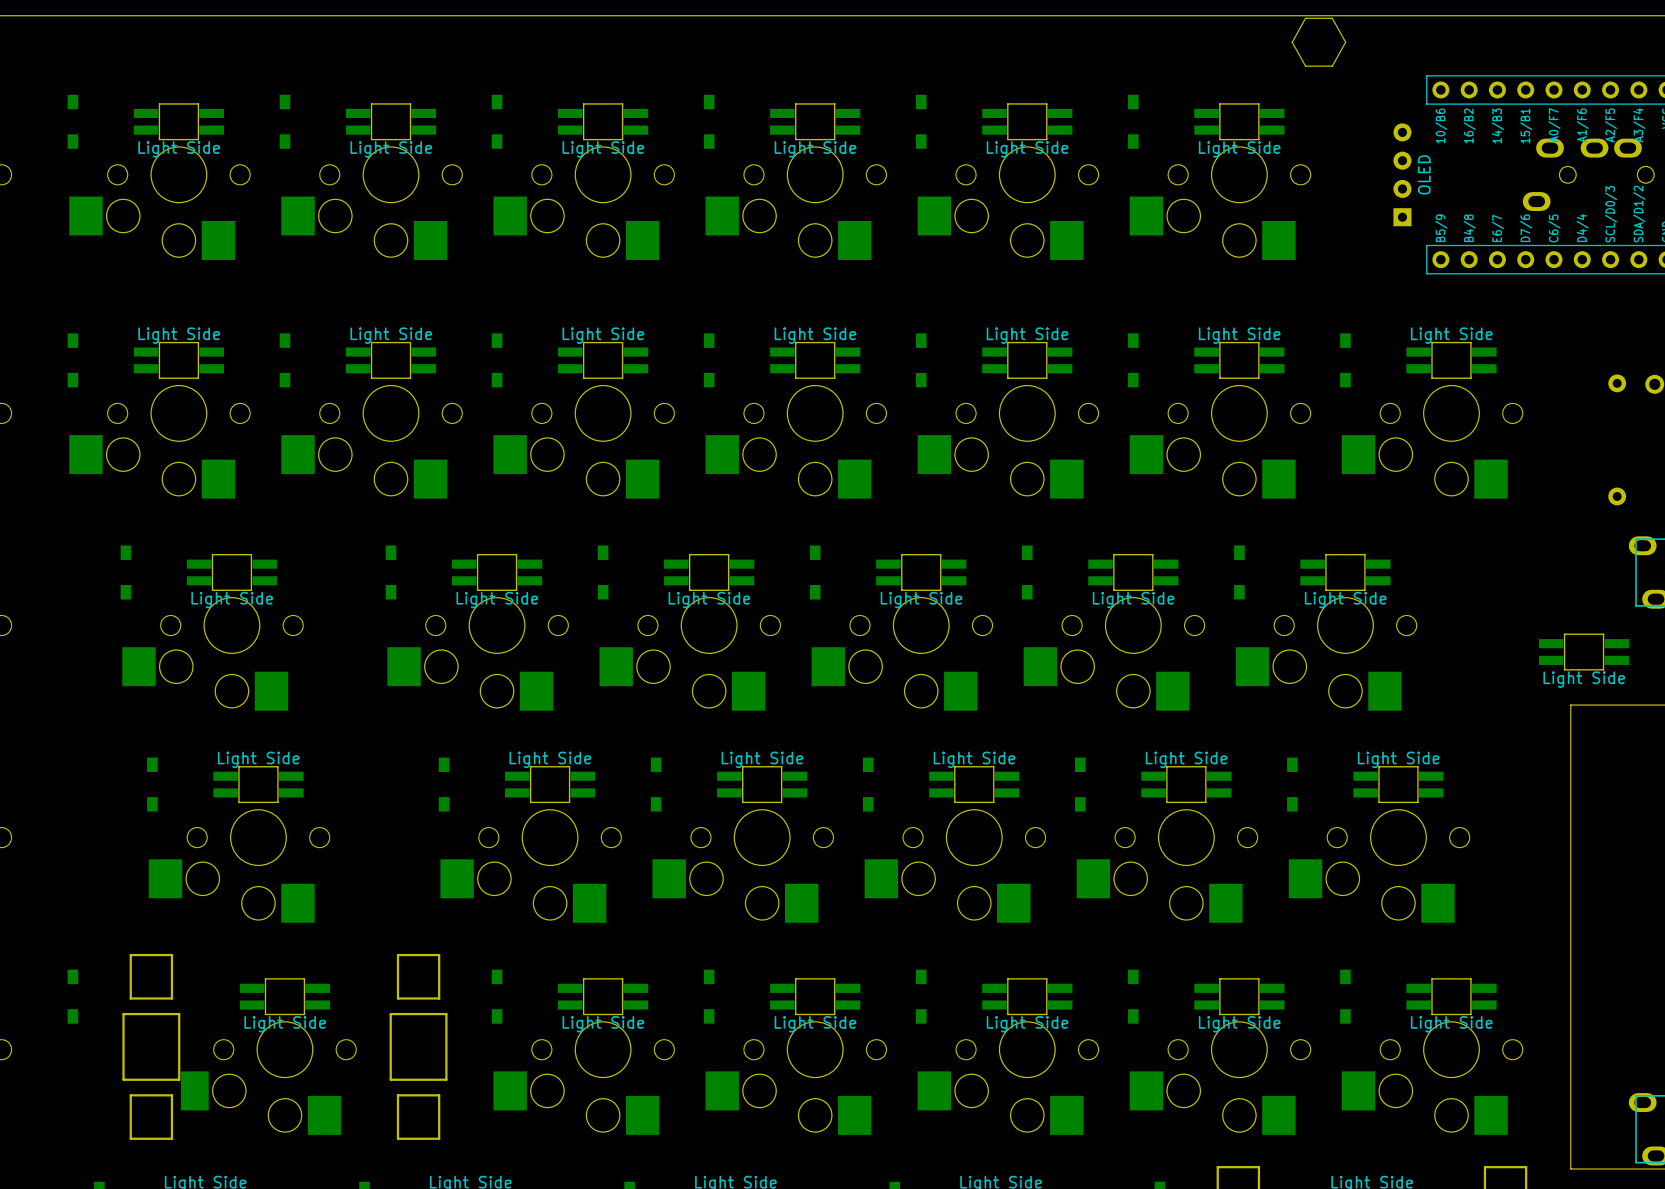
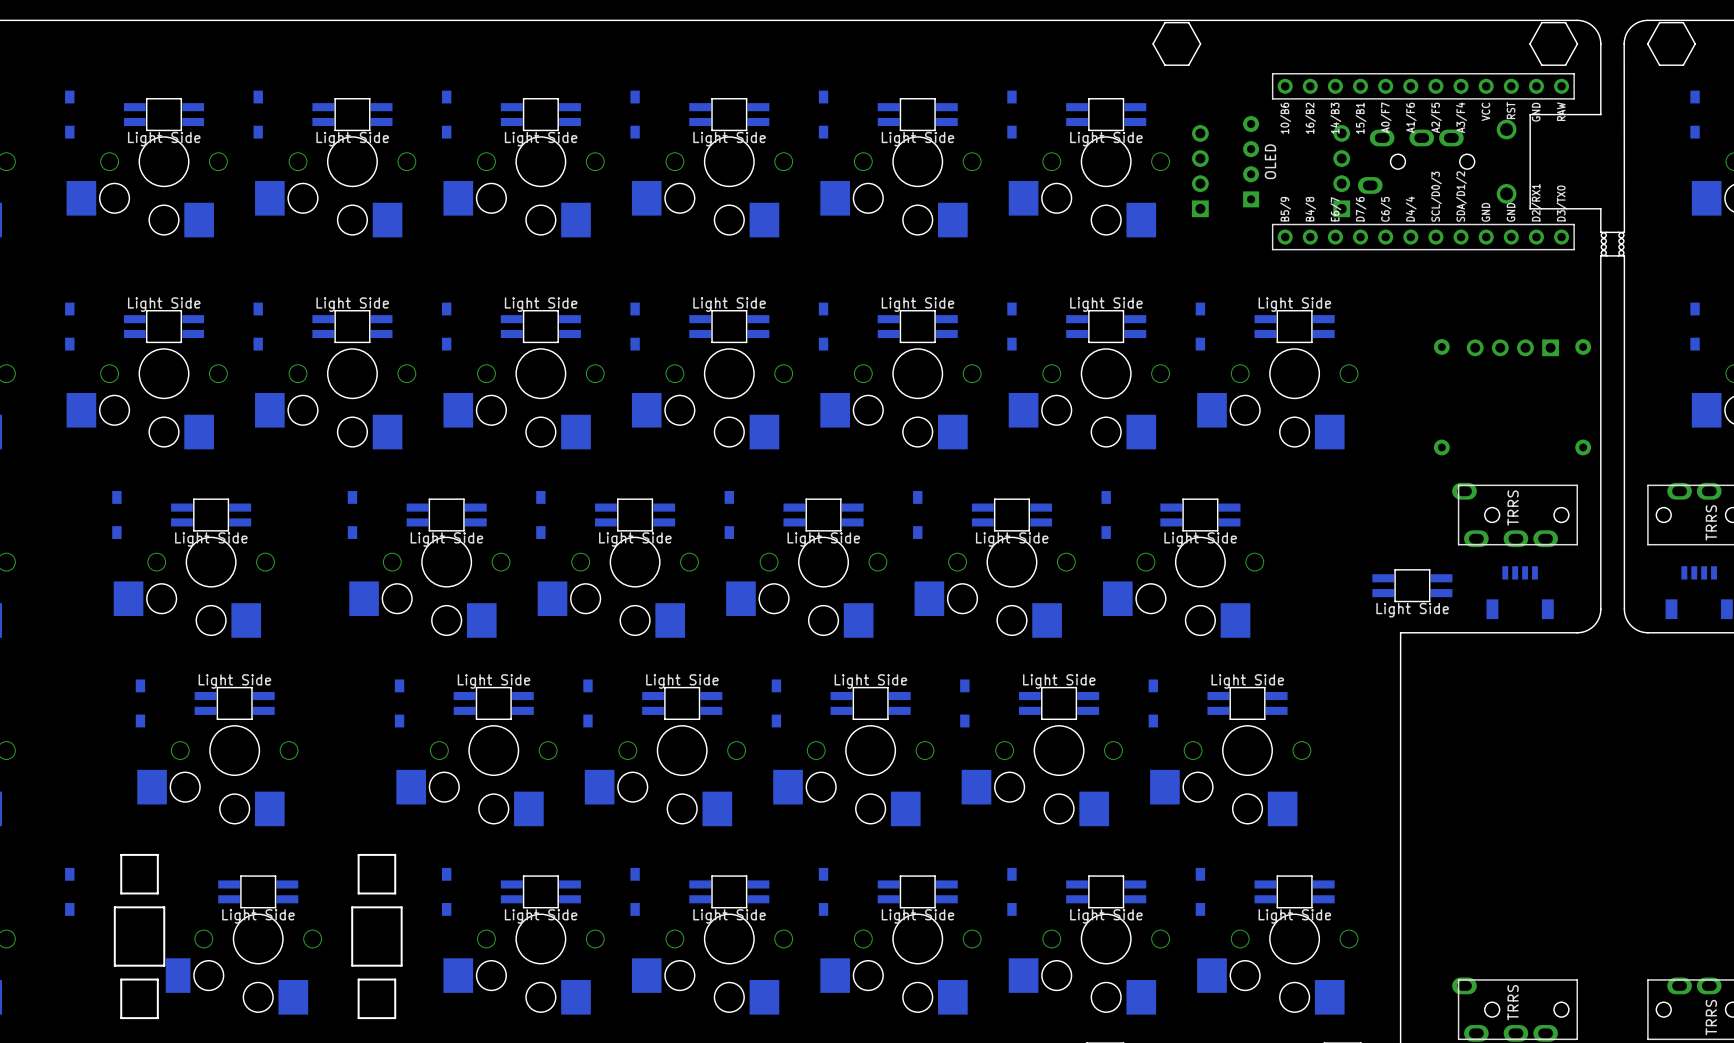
part: none -> (1200, 171)
part: none -> (1341, 171)

